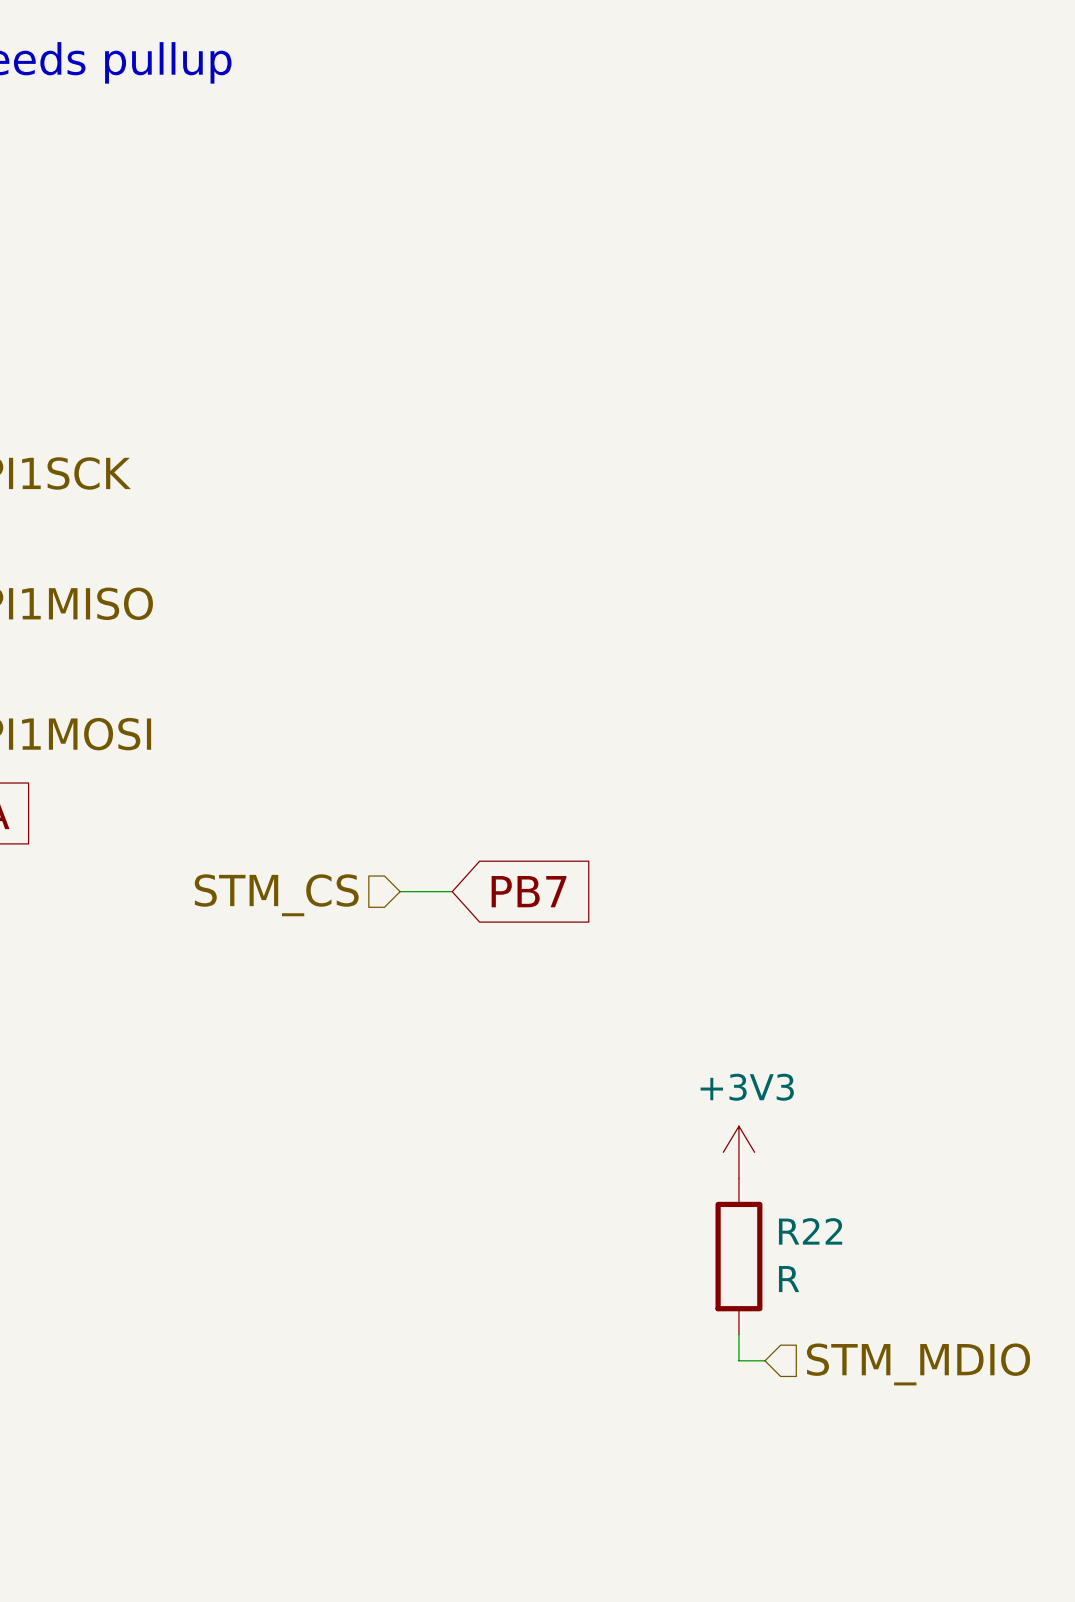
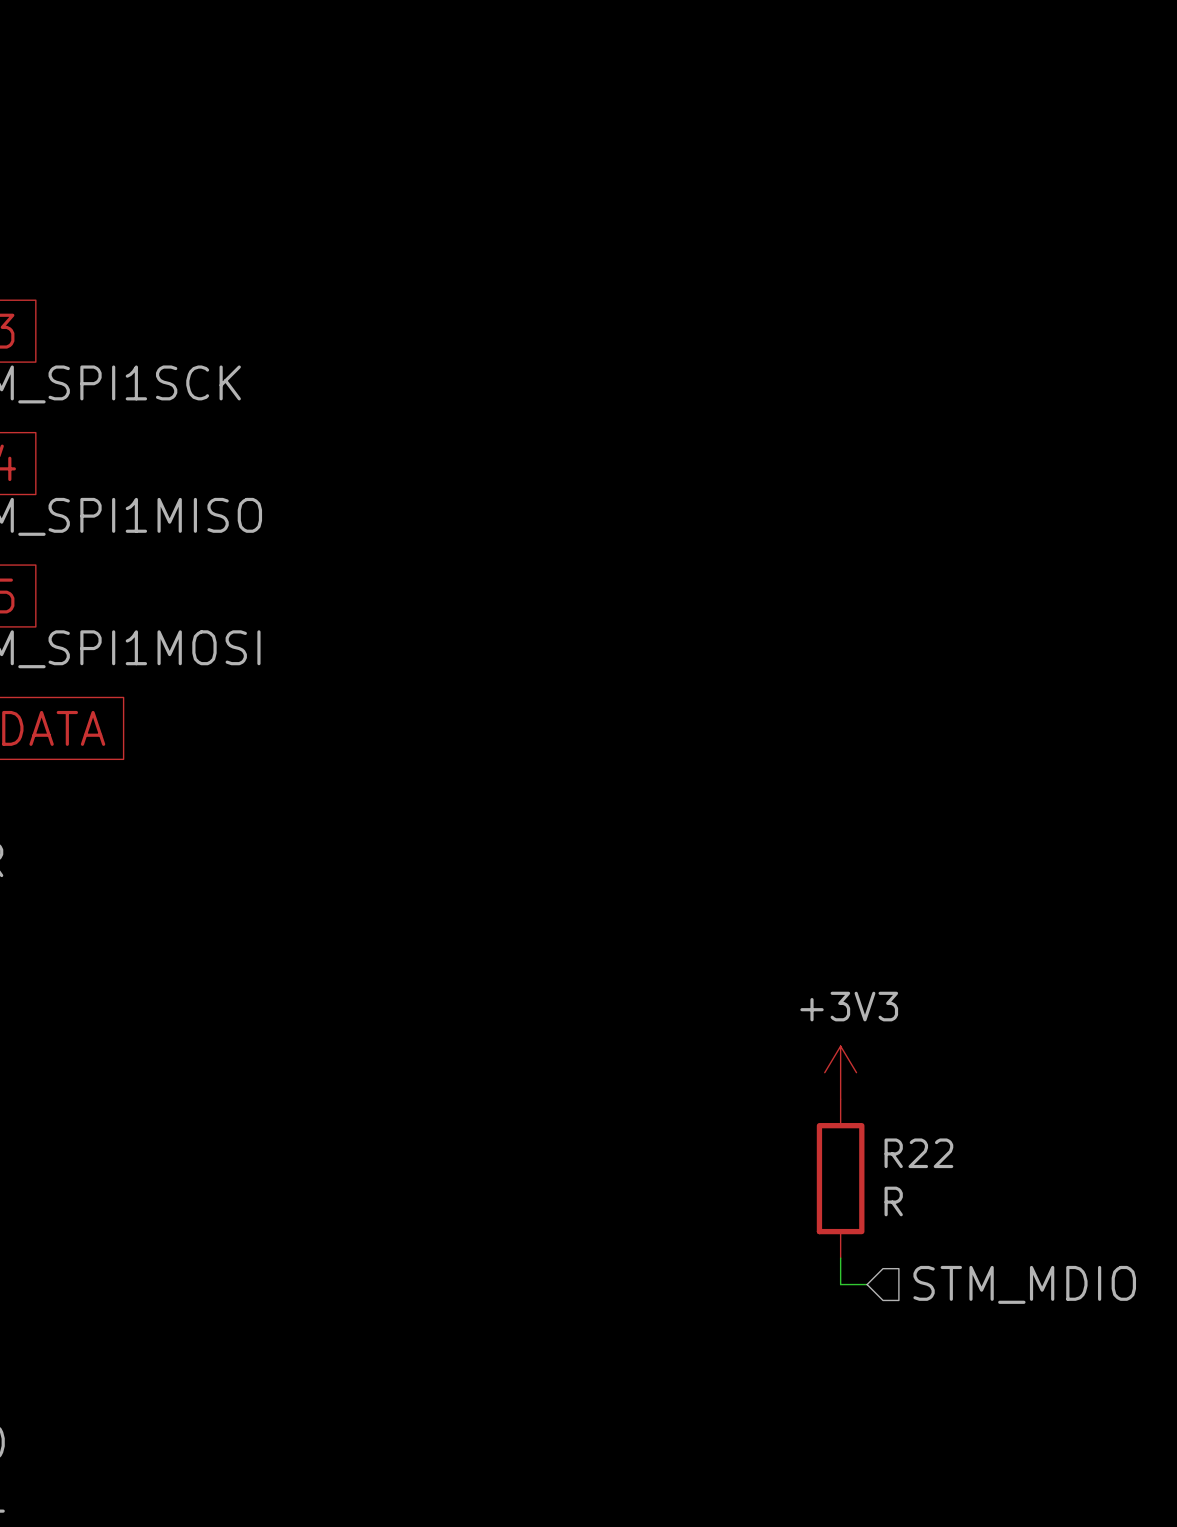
wire: (400, 891) (452, 891) -> none
global label: PB7 (529, 891) -> none
hierarchical label: STM_CS (276, 895) -> none

